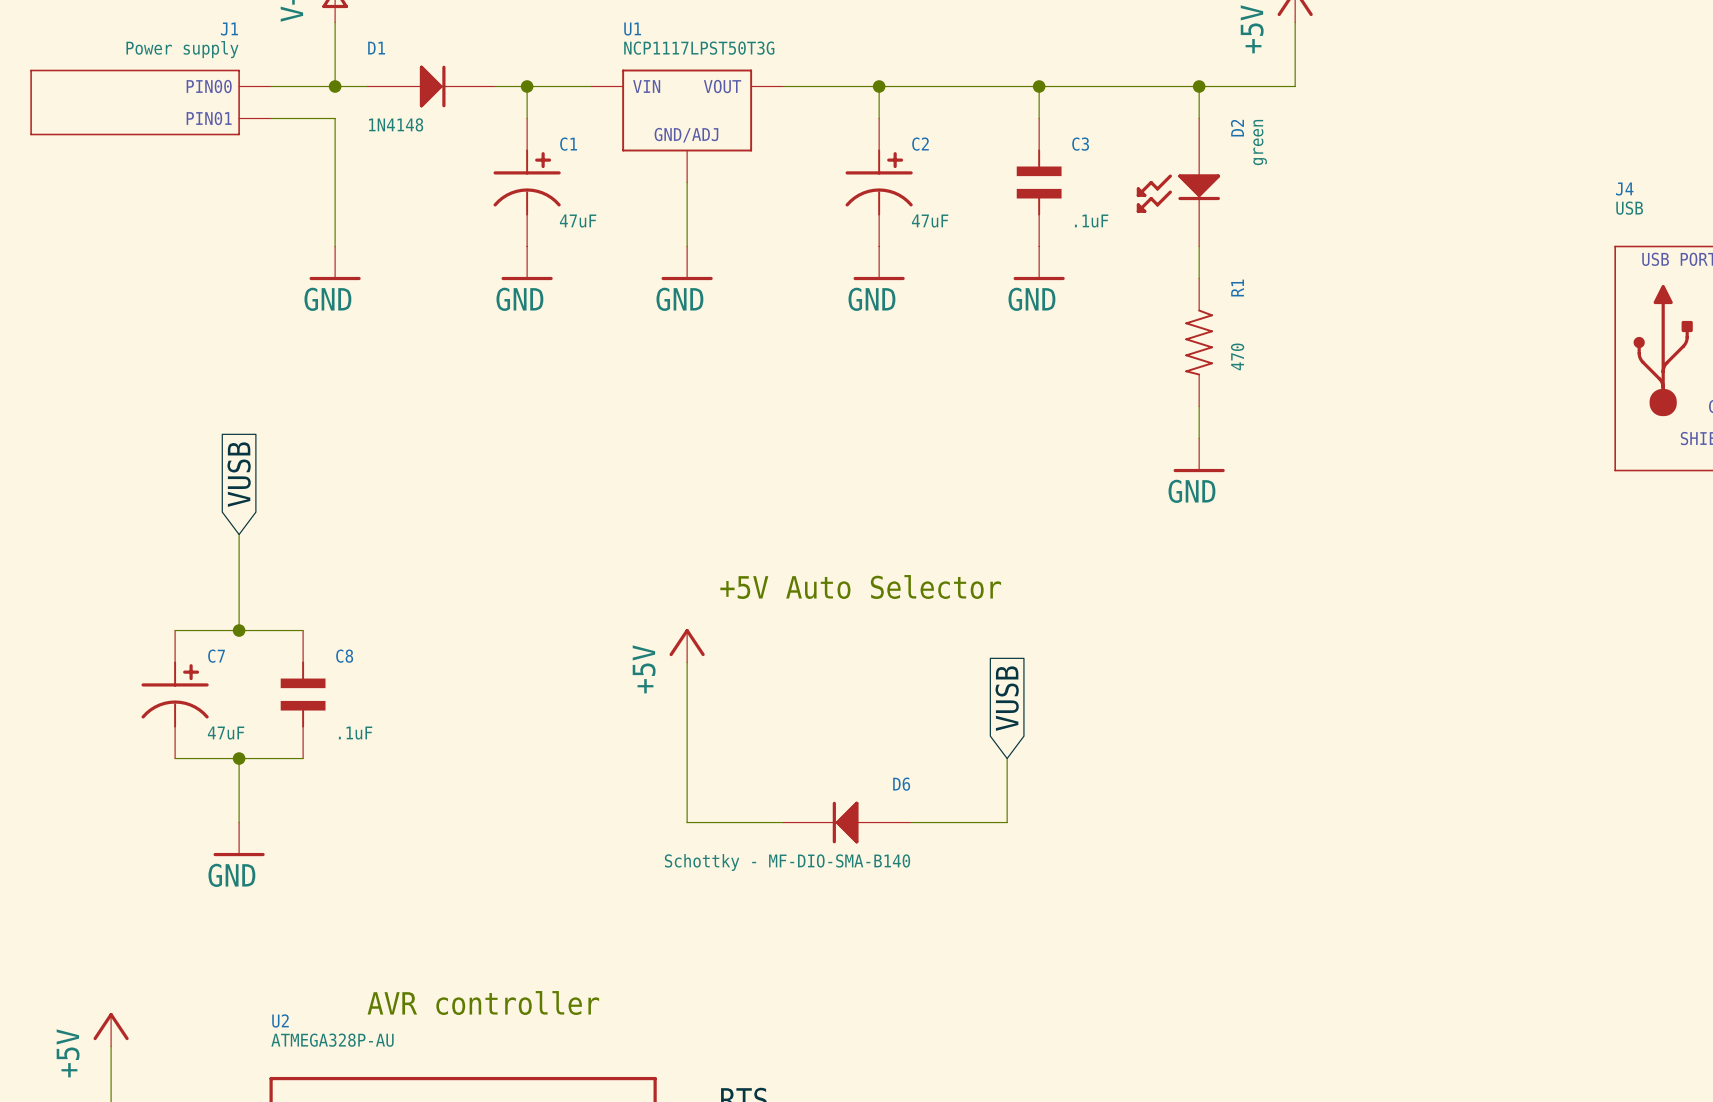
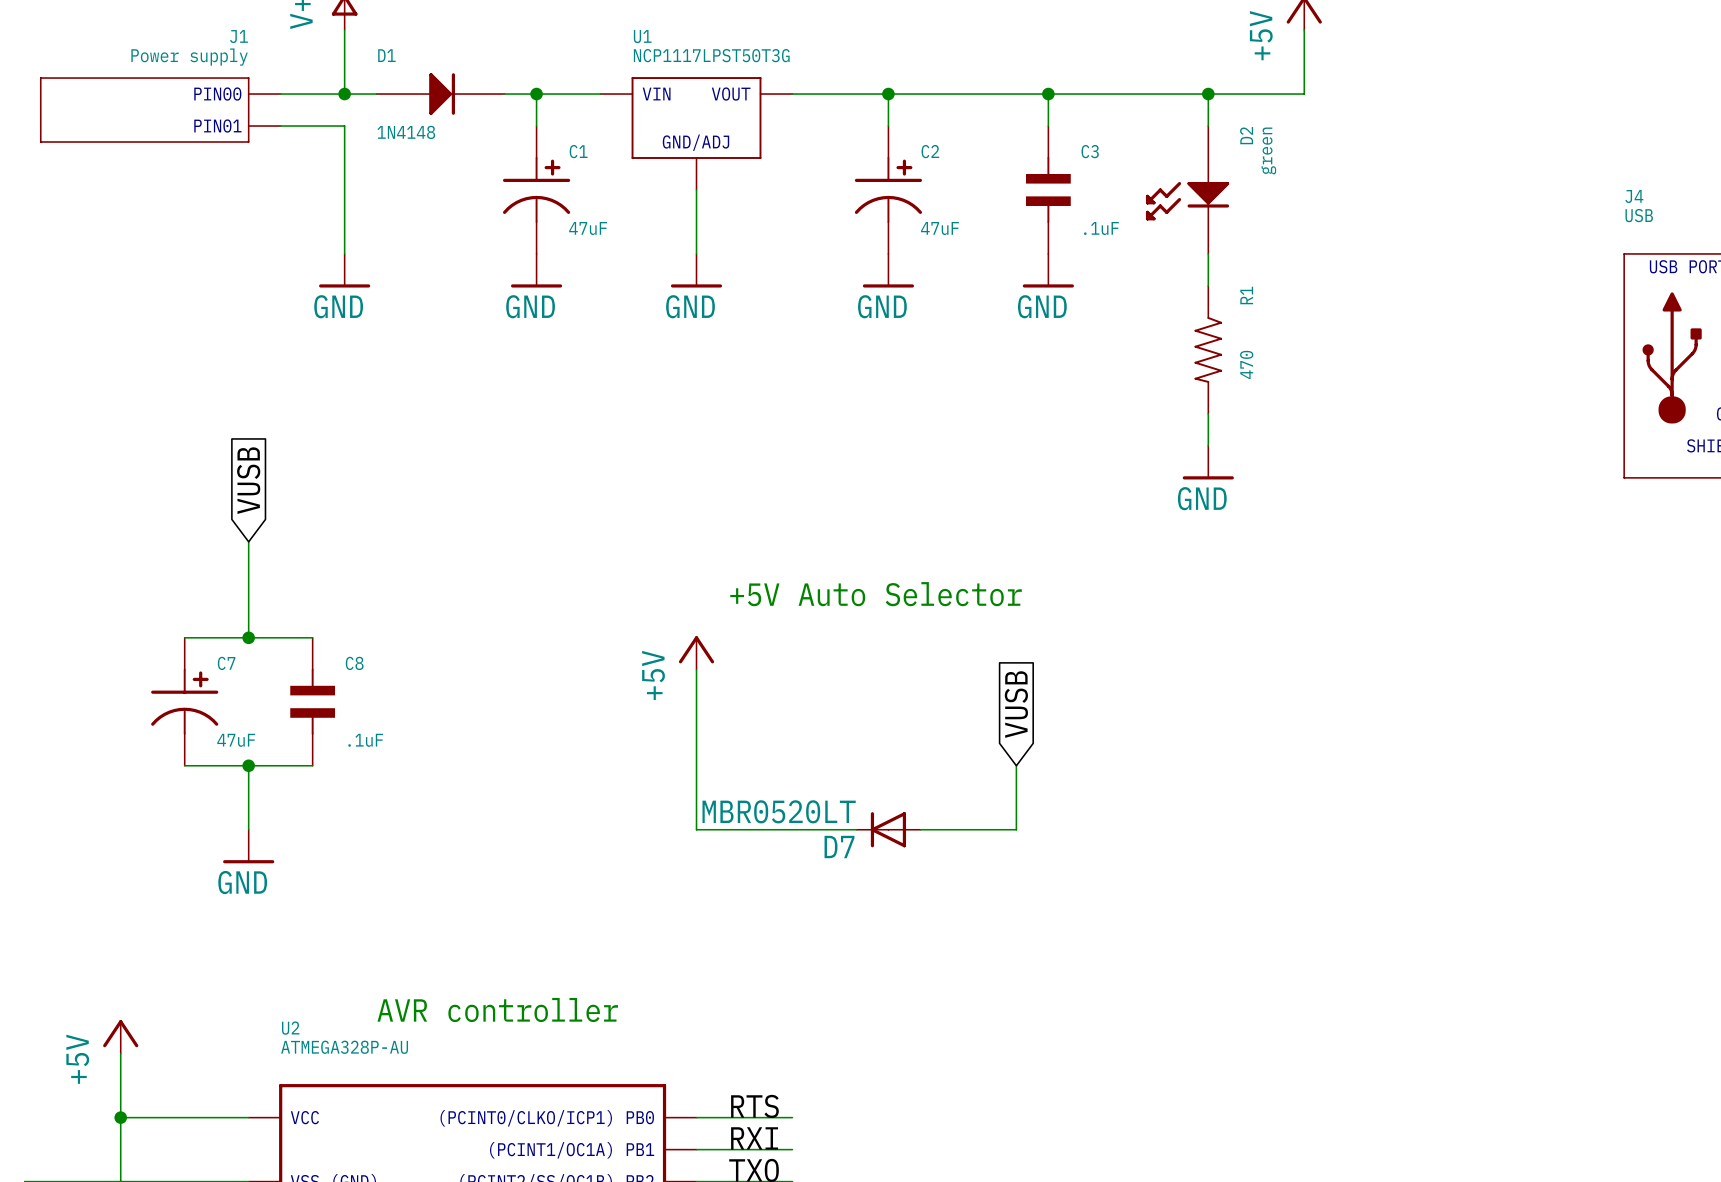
D6: Schottky - MF-DIO-SMA-B140 (847, 822) -> none
D7: none -> MBR0520LT (888, 829)

